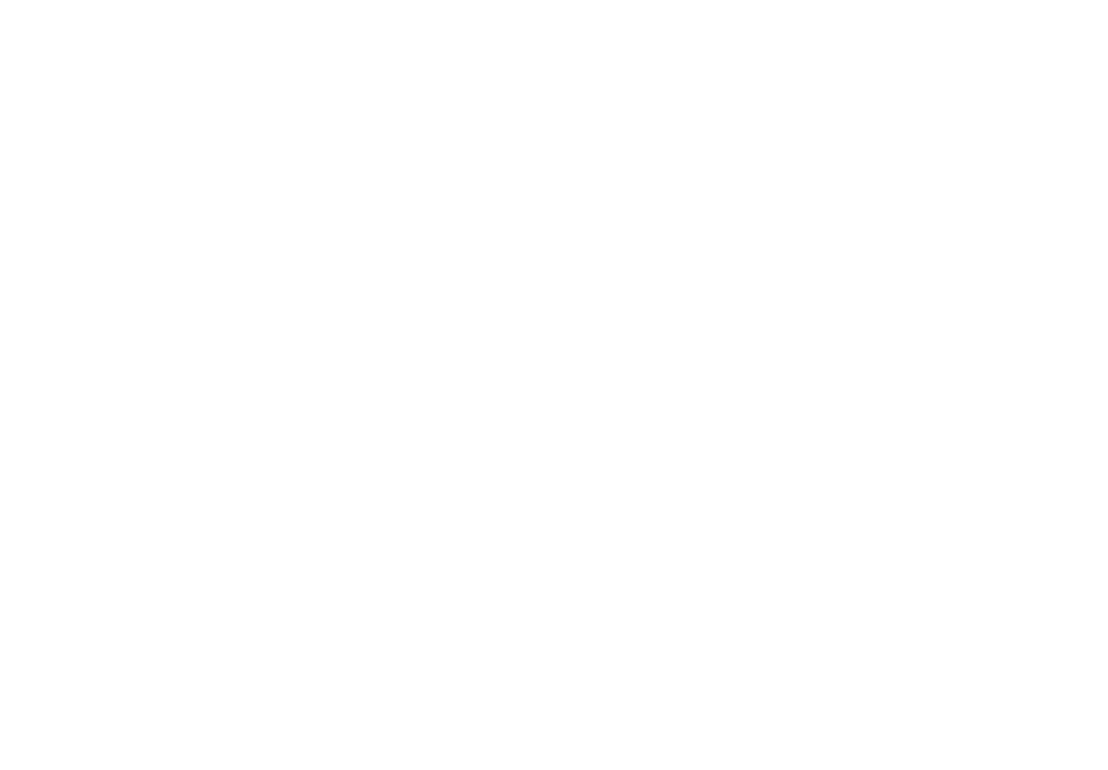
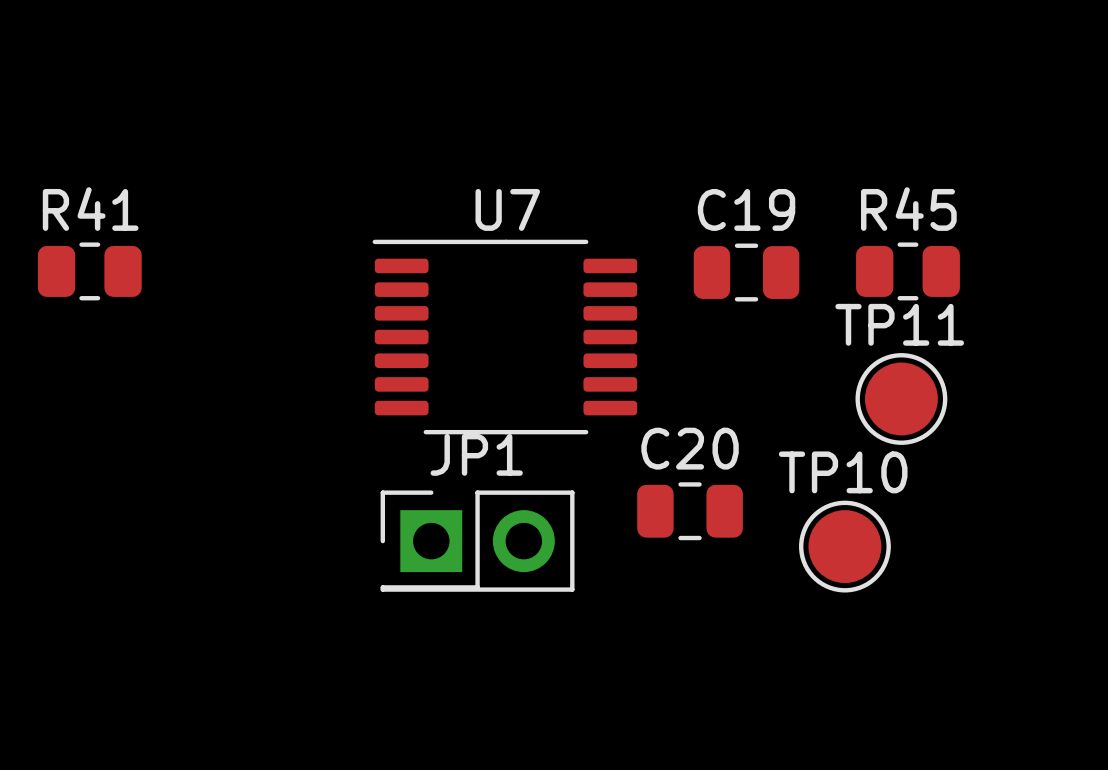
R41: none -> (89, 271)
R45: none -> (907, 271)
C19: none -> (746, 272)
U7: none -> (504, 337)
TP11: none -> (901, 398)
C20: none -> (690, 511)
JP1: none -> (477, 541)
TP10: none -> (844, 546)

